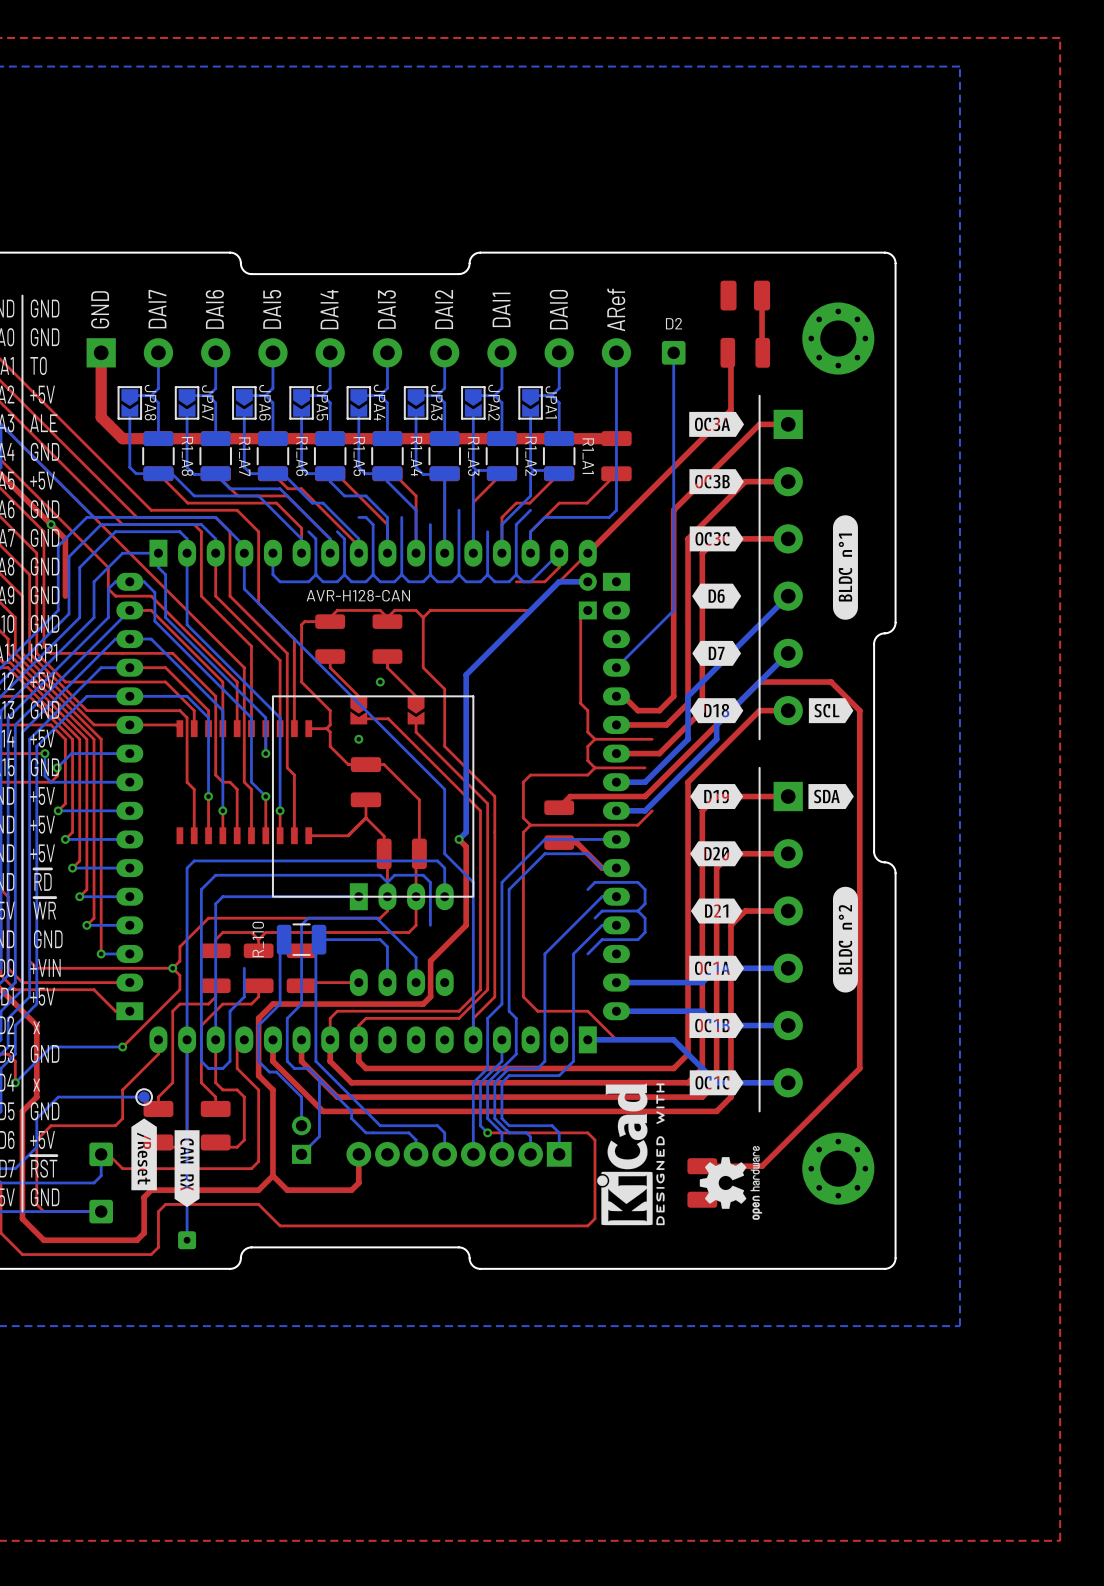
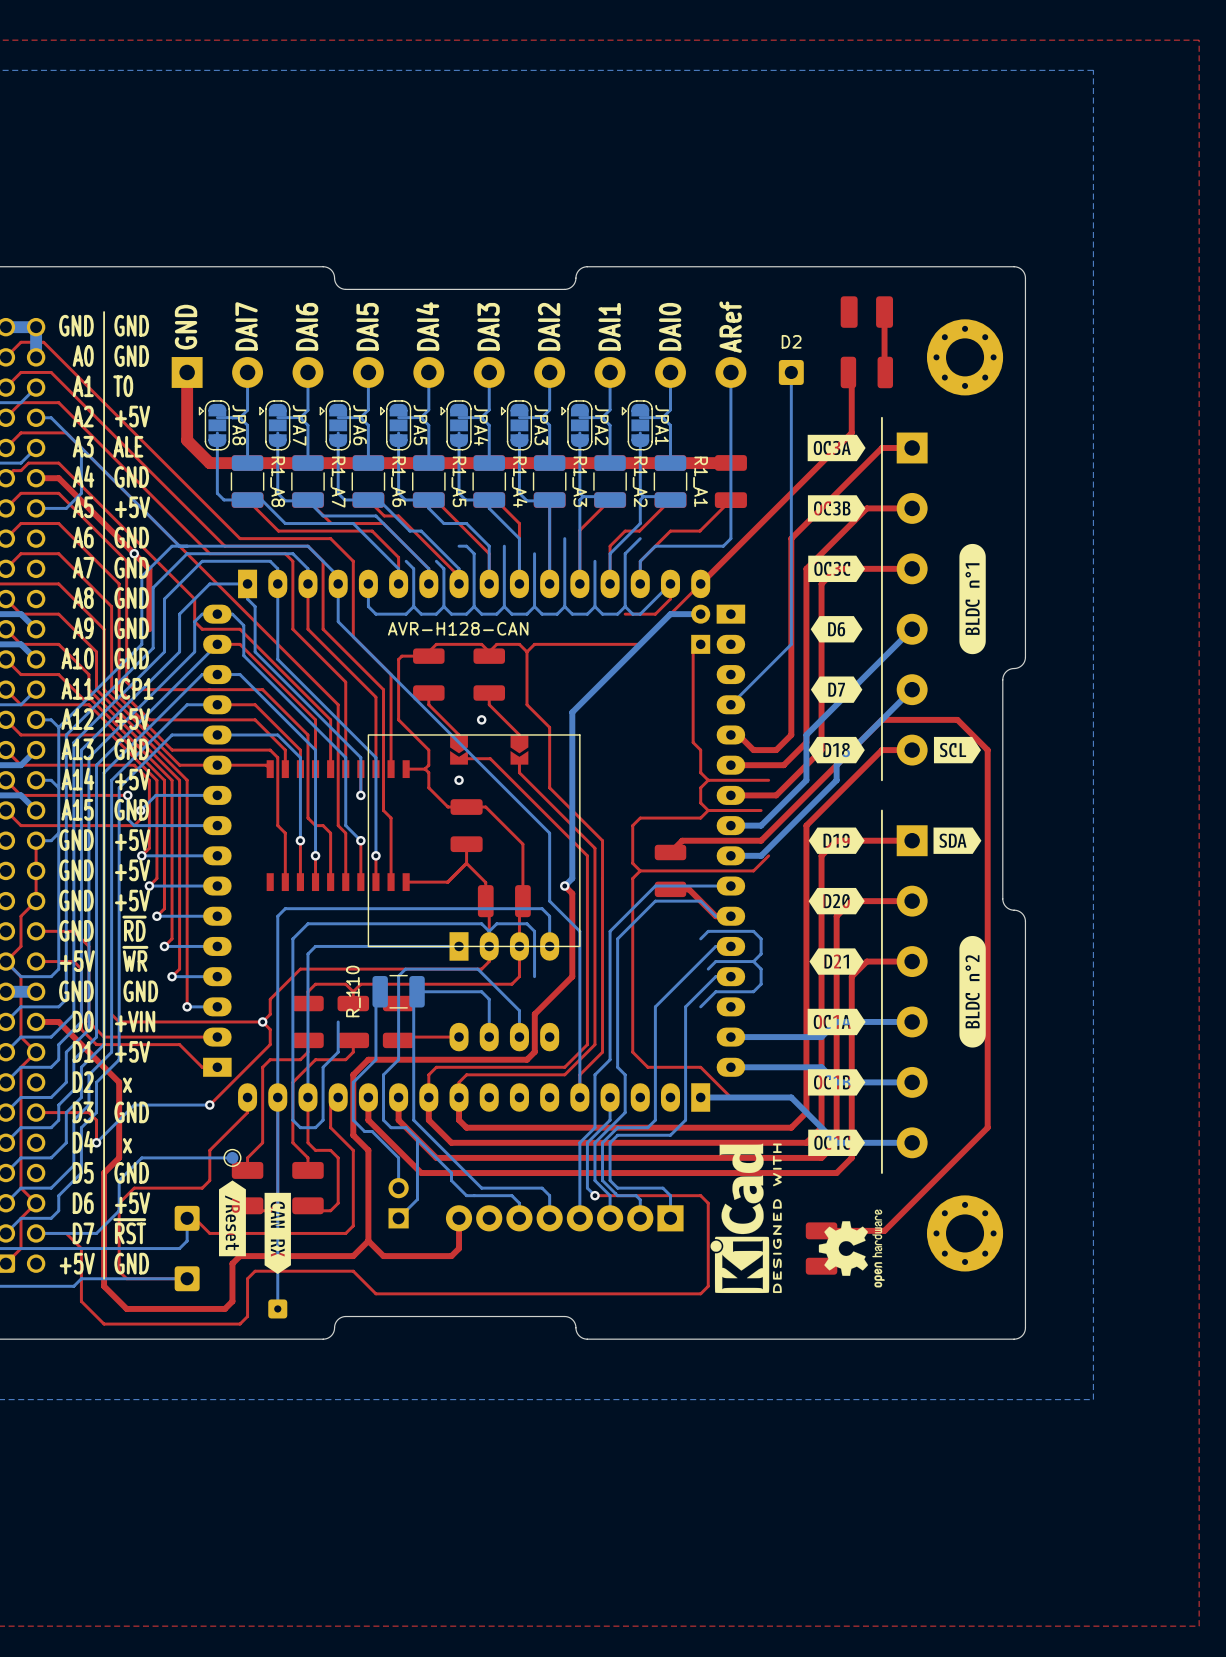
JPA8 footprint: [117, 386, 142, 420] -> [198, 400, 230, 451]
JPA7 footprint: [175, 386, 200, 420] -> [259, 400, 291, 451]
JPA6 footprint: [232, 386, 257, 420] -> [319, 400, 351, 451]
JPA5 footprint: [289, 386, 314, 420] -> [380, 400, 412, 451]
JPA4 footprint: [346, 386, 371, 420] -> [440, 400, 472, 451]
JPA3 footprint: [404, 386, 429, 420] -> [500, 400, 533, 451]
JPA2 footprint: [461, 386, 486, 420] -> [561, 400, 593, 451]
JPA1 footprint: [518, 386, 543, 420] -> [621, 400, 653, 451]

